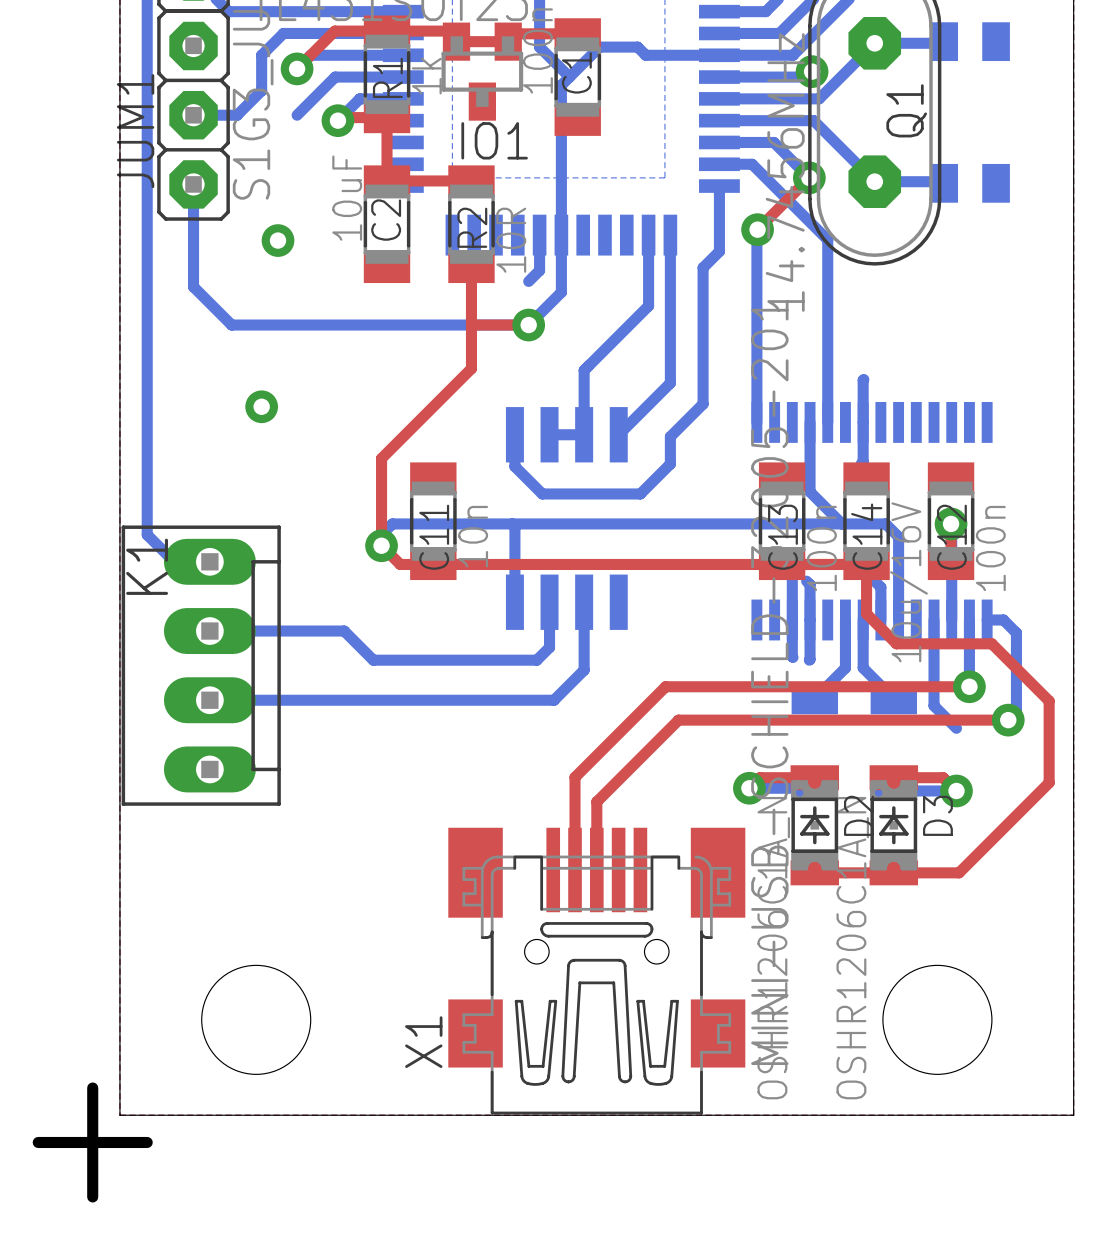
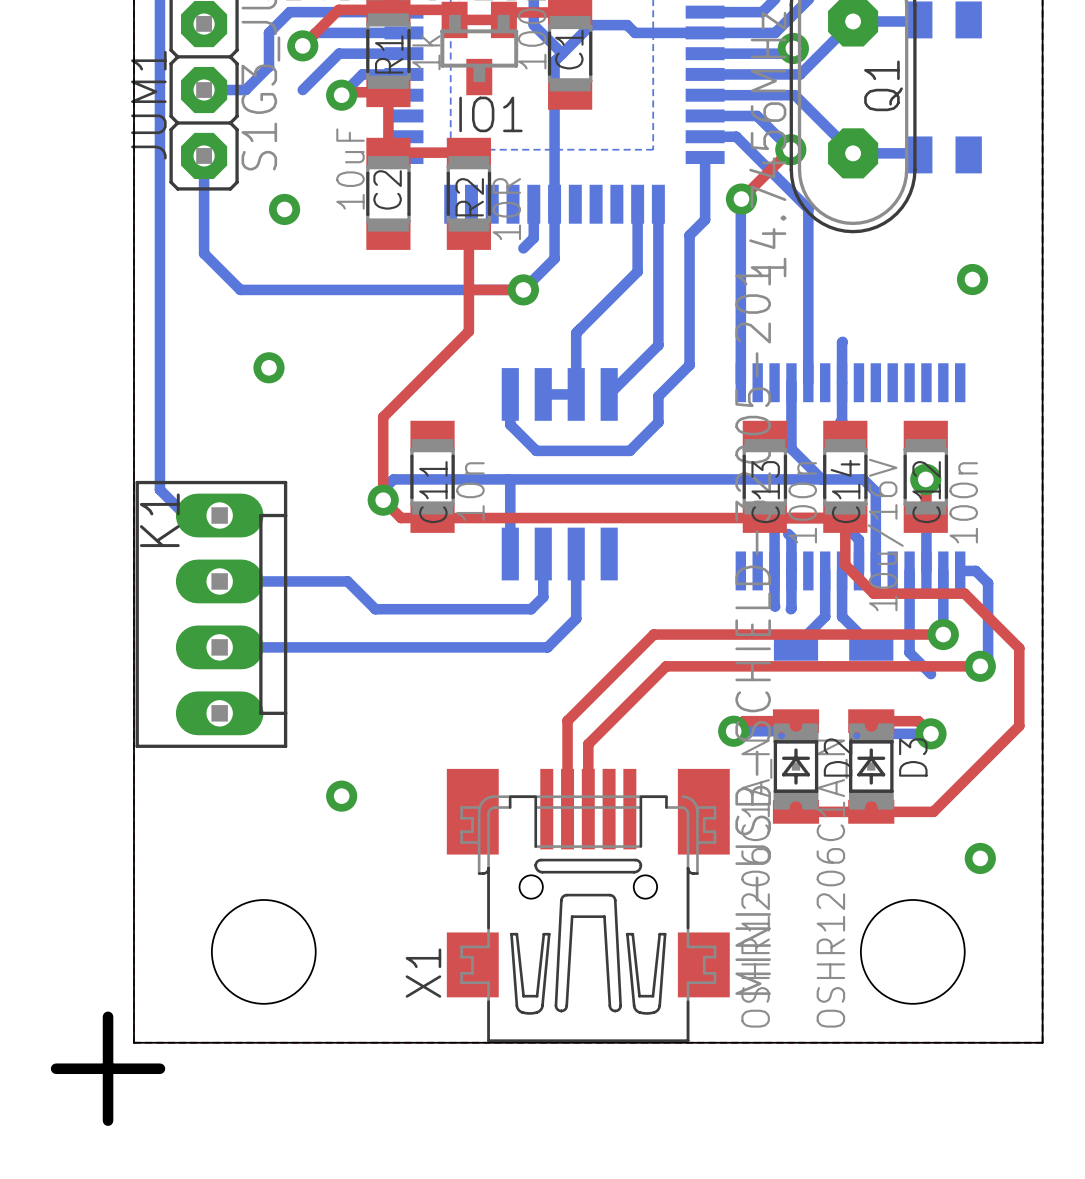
via: none -> (972, 279)
via: none -> (341, 796)
via: none -> (980, 858)

